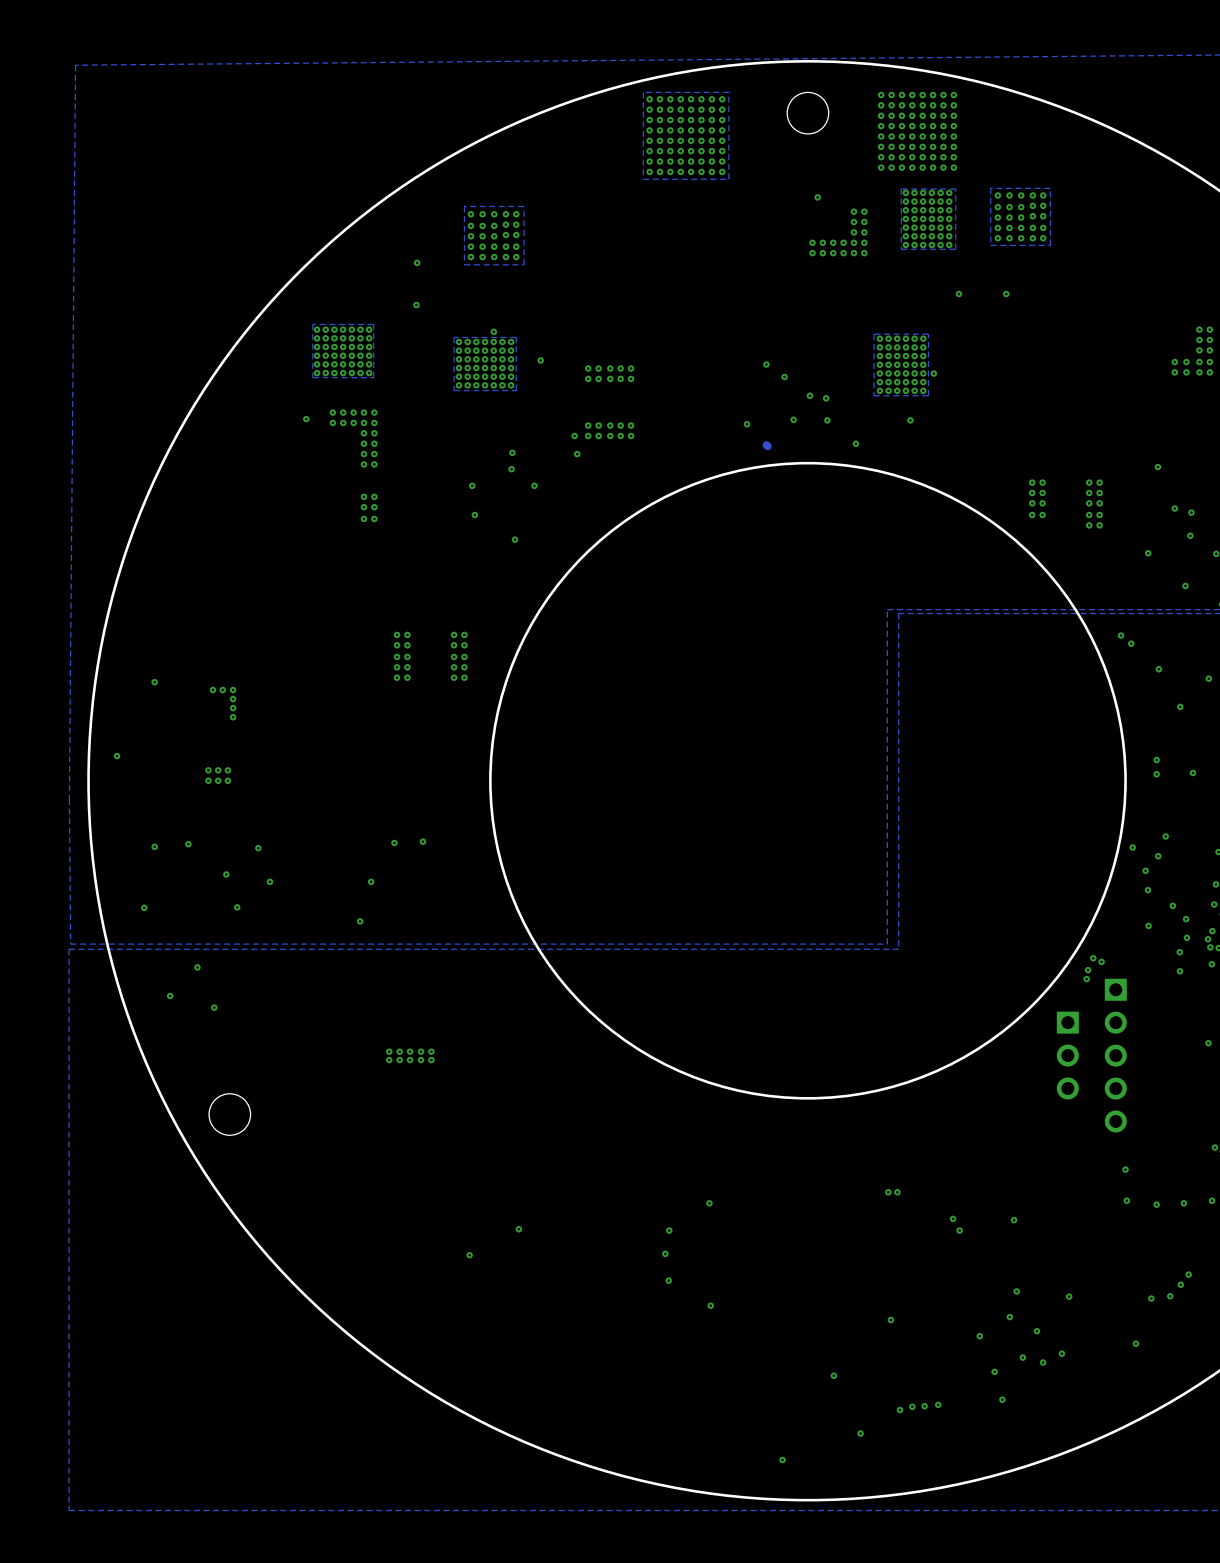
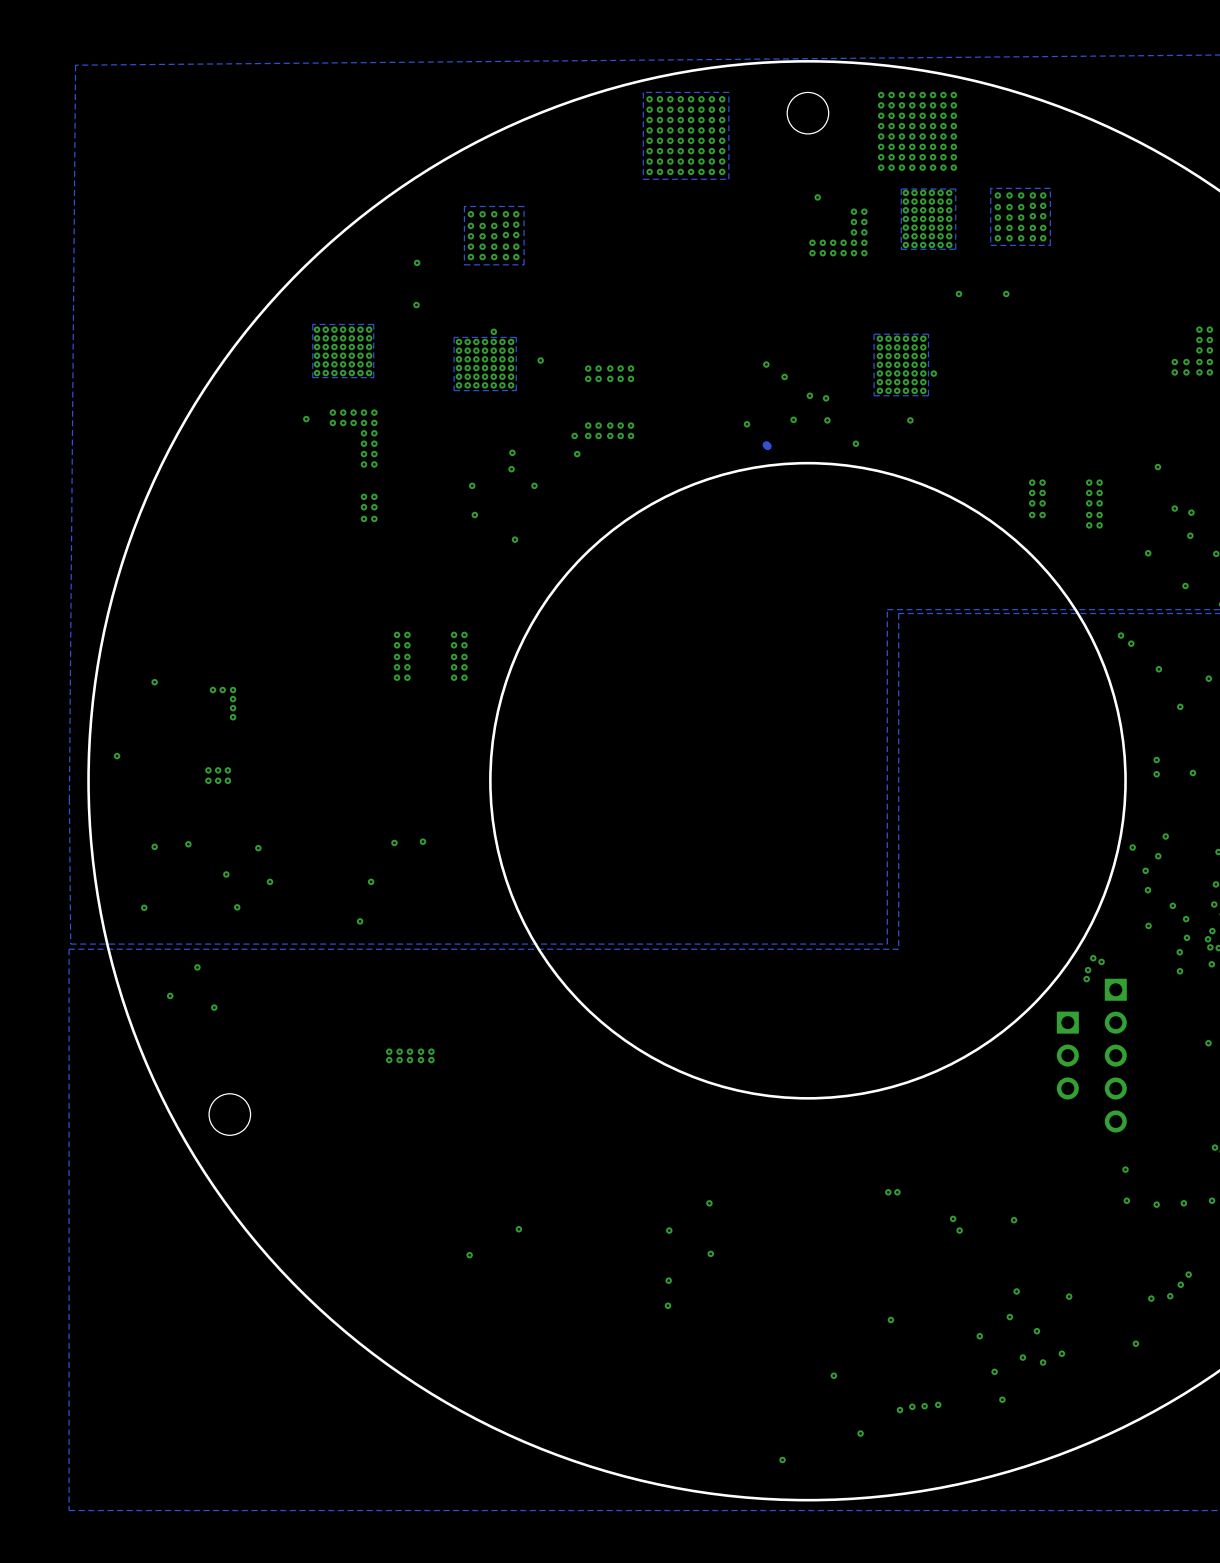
via: (665, 1253) -> none
via: none -> (710, 1253)
via: none -> (667, 1305)
via: (710, 1305) -> none

